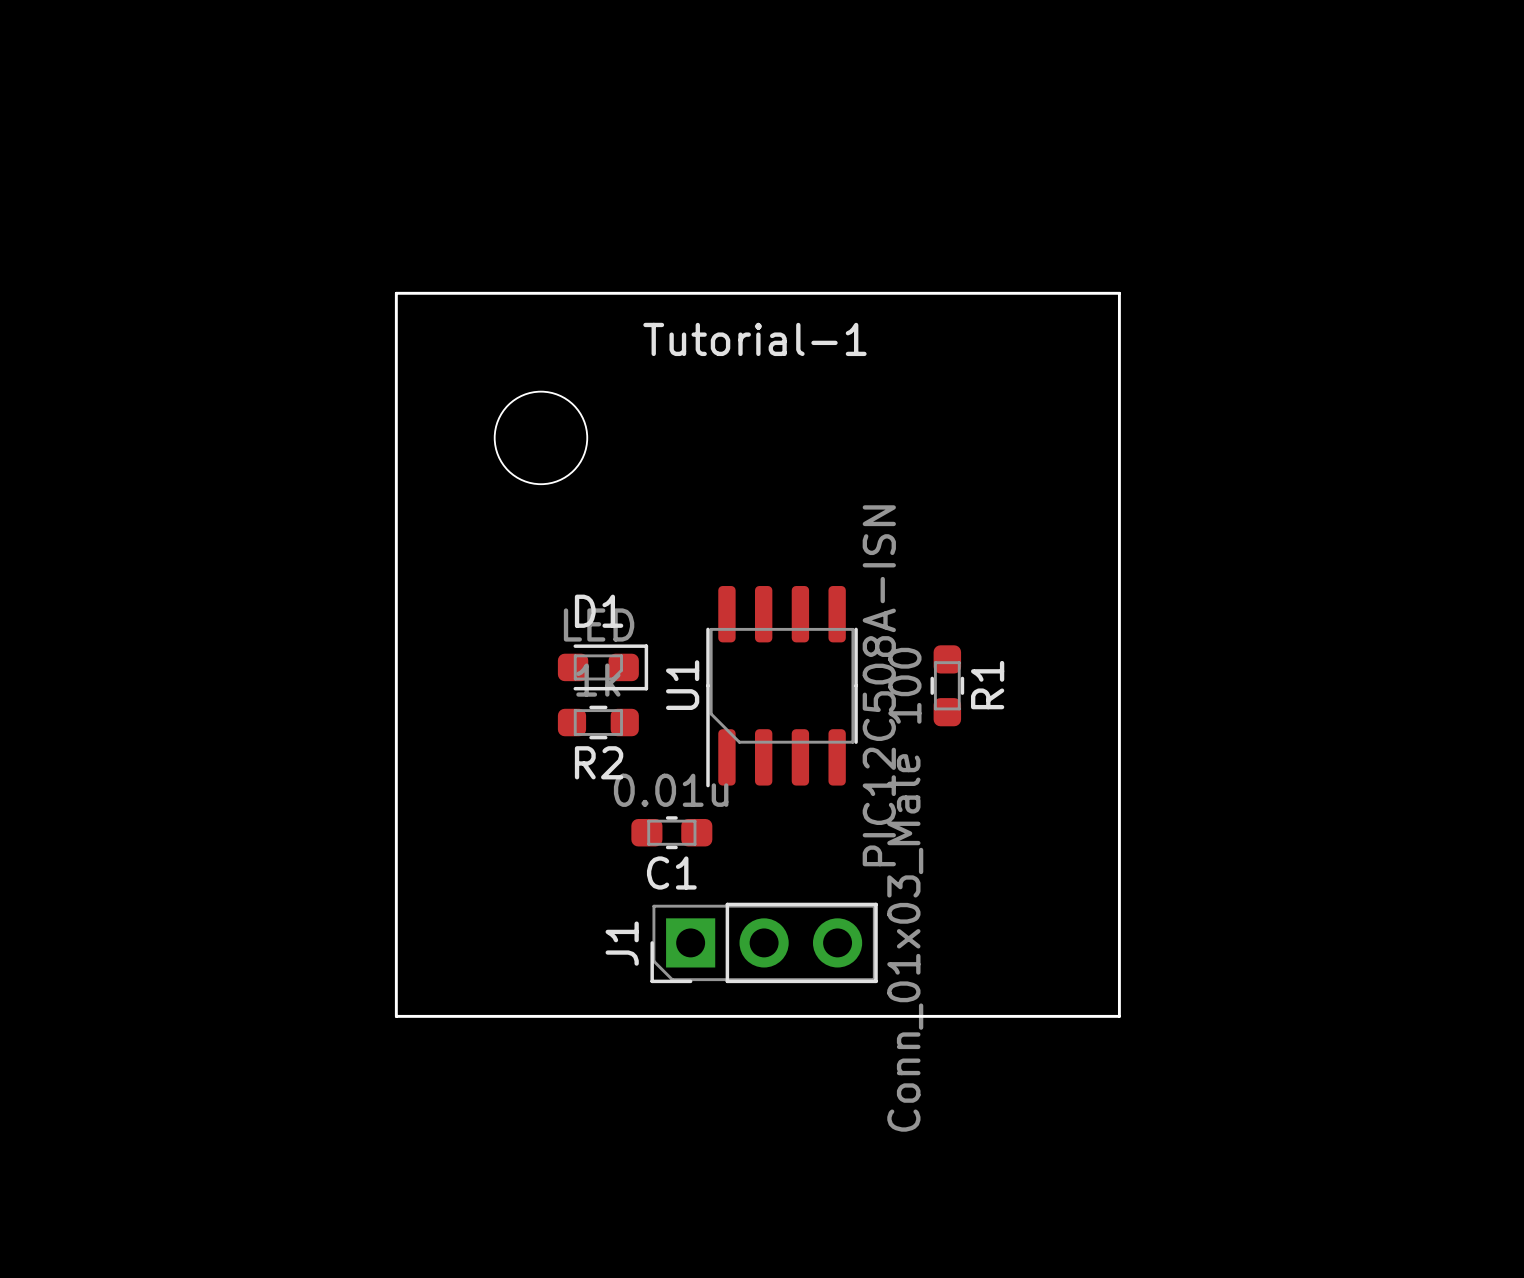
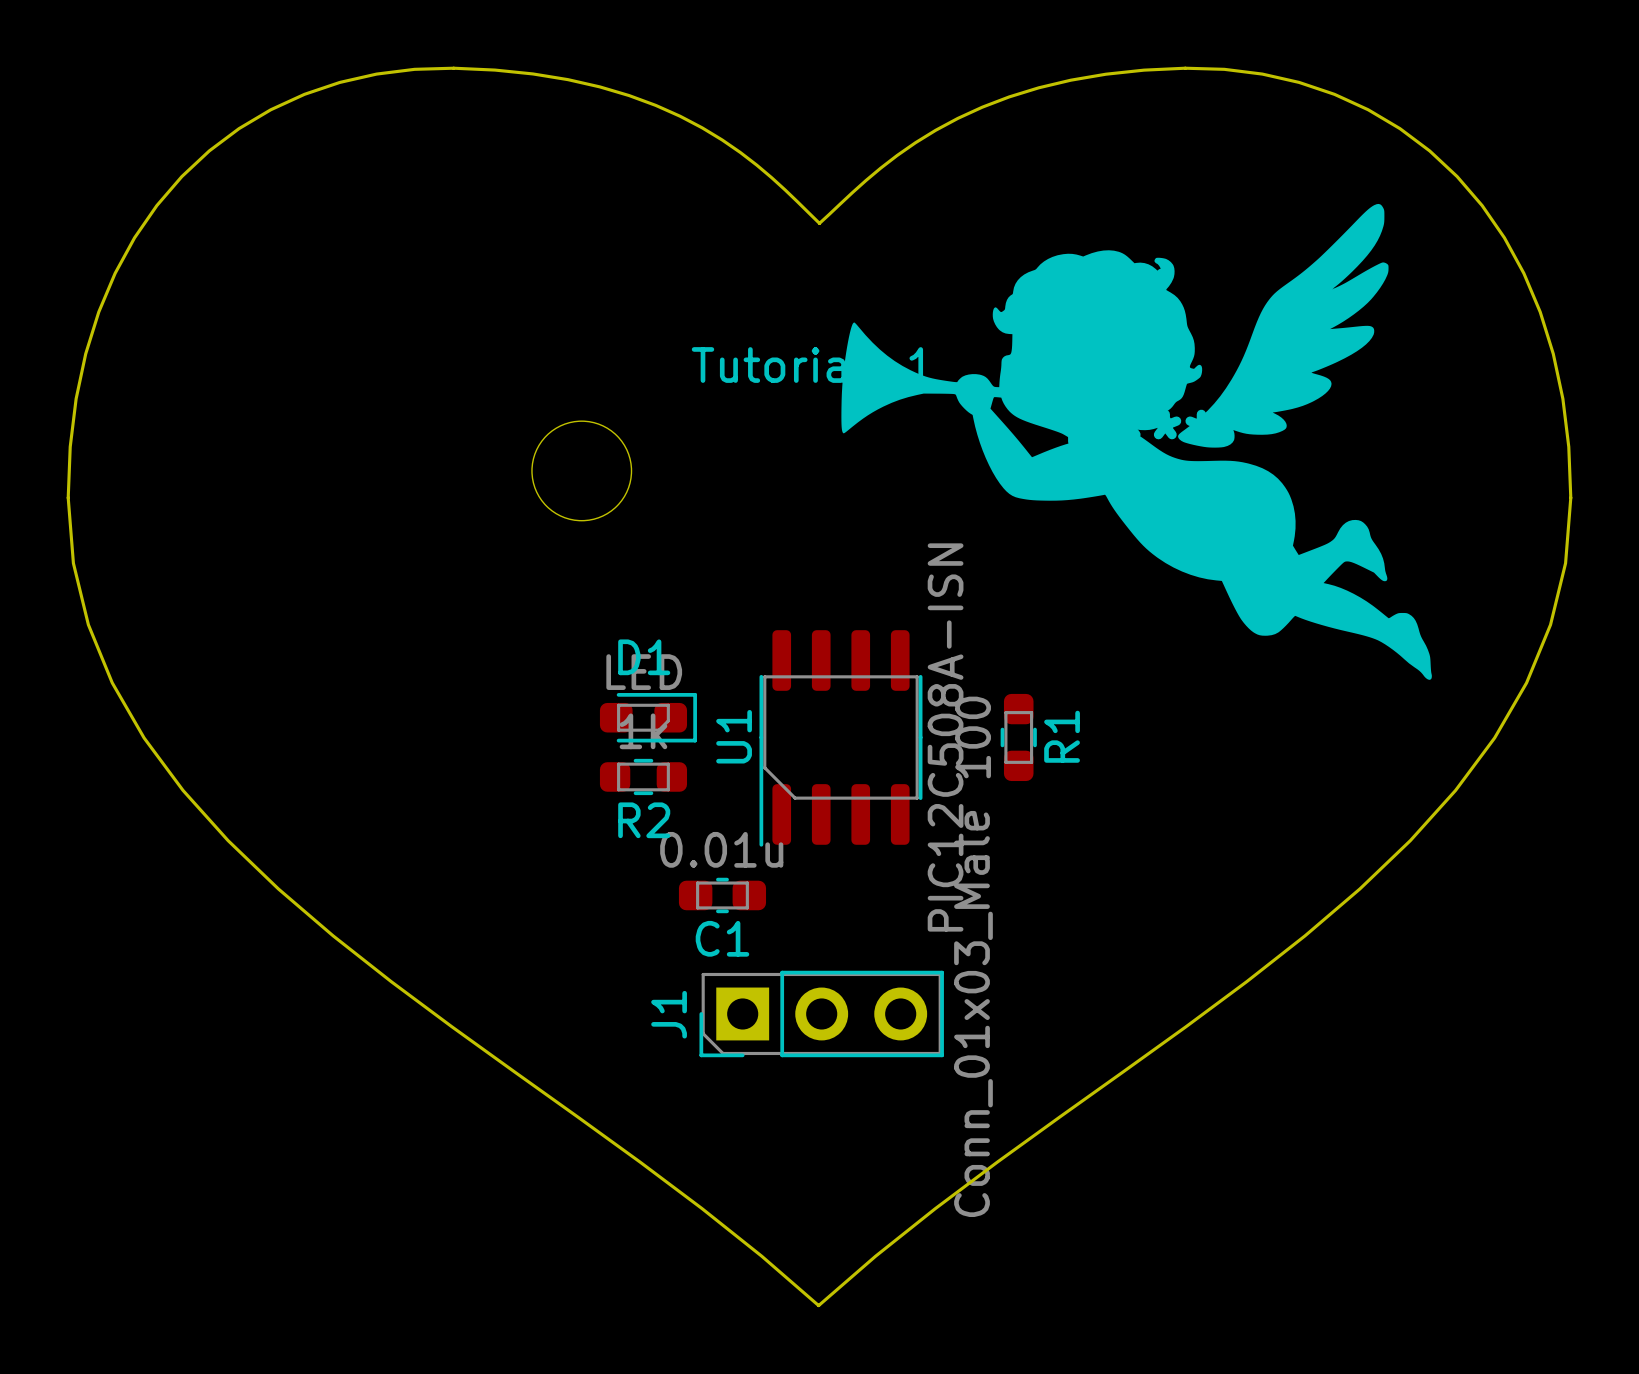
board edge: none -> (453, 68) (494, 70) (567, 79) (599, 86) (655, 105) (702, 127) (740, 152) (771, 177) (819, 223) (865, 180) (915, 142) (957, 118) (982, 107) (1038, 87) (1105, 74) (1185, 68) (1224, 69) (1262, 74) (1299, 82) (1334, 94) (1368, 109) (1399, 128) (1429, 150) (1457, 176) (1482, 205) (1504, 237) (1523, 273) (1540, 312) (1553, 353) (1562, 398) (1568, 446) (1570, 497) (1565, 563) (1550, 624) (1526, 682) (1494, 737) (1455, 790) (1410, 840) (1359, 888) (1305, 935) (1185, 1026) (935, 1208) (875, 1256) (818, 1305) (761, 1256) (701, 1208) (391, 981) (333, 935) (278, 888) (228, 840) (183, 790) (144, 737) (112, 682) (88, 624) (73, 563) (68, 497) (70, 446) (76, 398) (85, 353) (98, 312) (115, 273) (134, 237) (156, 205) (181, 176) (209, 150) (239, 128) (270, 109) (304, 94) (339, 82) (376, 74) (414, 69) (453, 68)
board edge: (396, 293) (1119, 293) (1119, 1016) (396, 1016) (396, 293) -> none
part: none -> (1136, 441)

